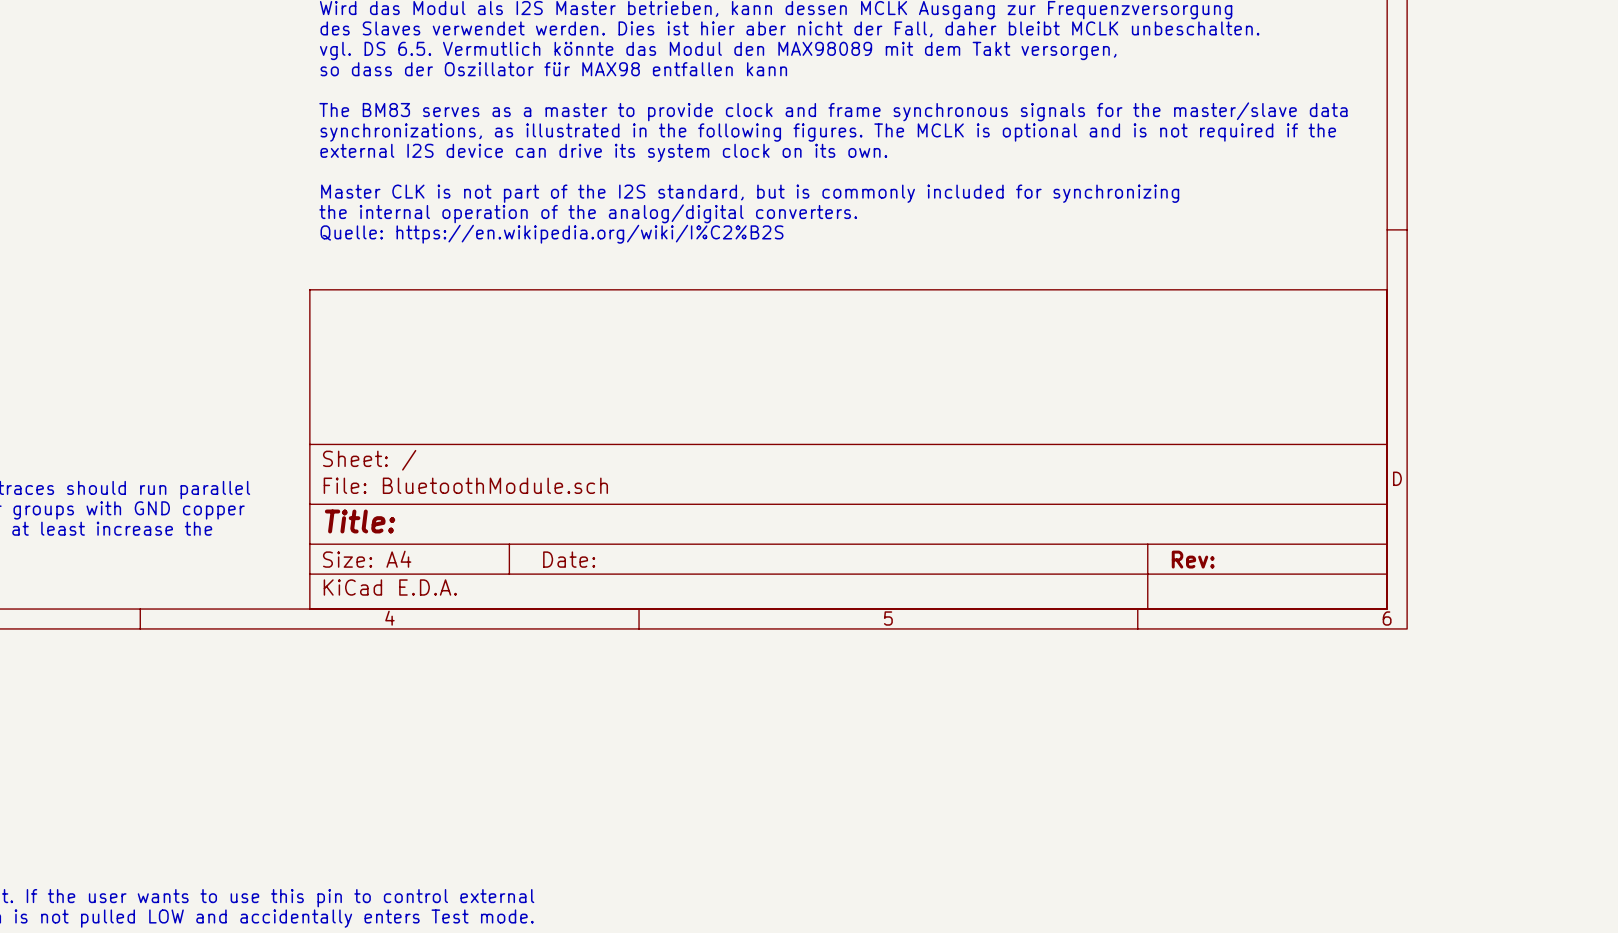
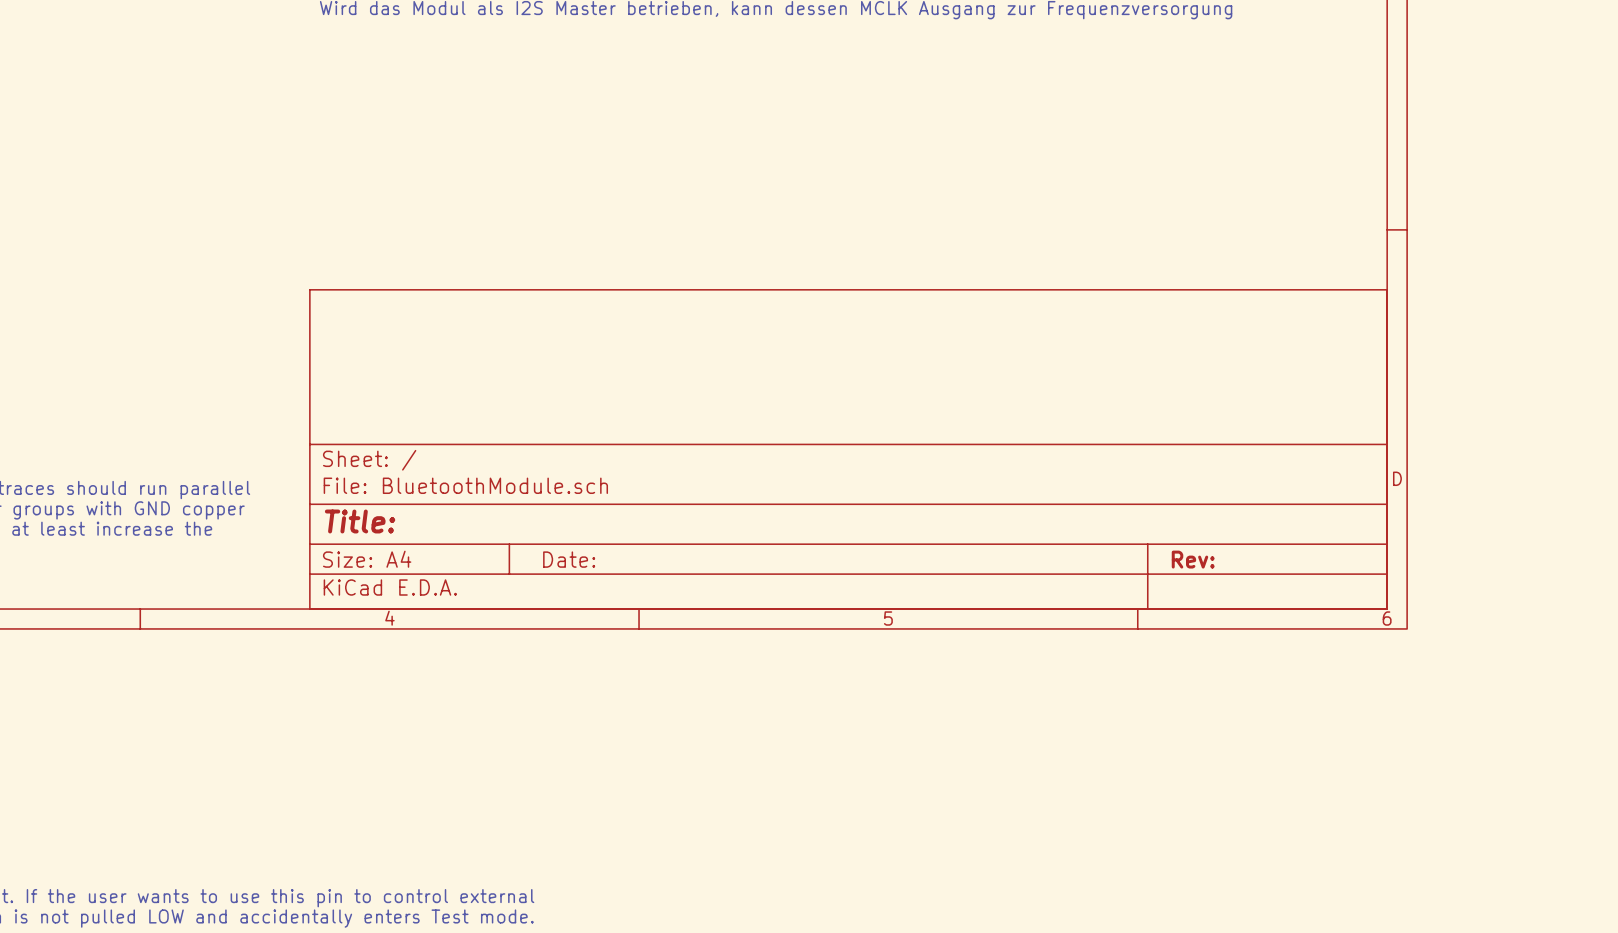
text: des Slaves verwendet werden. Dies ist hier aber nicht der Fall, daher bleibt MCLK unbeschalten. (789, 29) -> none
text: vgl. DS 6.5. Vermutlich könnte das Modul den MAX98089 mit dem Takt versorgen, (718, 50) -> none
text: so dass der Oszillator für MAX98 entfallen kann (553, 69) -> none
text: The BM83 serves as a master to provide clock and frame synchronous signals for the master/slave data (833, 111) -> none
text: synchronizations, as illustrated in the following figures. The MCLK is optional and is not required if the (828, 132) -> none
text: external I2S device can drive its system clock on its own. (603, 152) -> none
text: Master CLK is not part of the I2S standard, but is commonly included for synchronizing (750, 193) -> none
text: the internal operation of the analog/digital converters. (588, 213) -> none
text: Quelle: https://en.wikipedia.org/wiki/I%C2%B2S (551, 234) -> none

